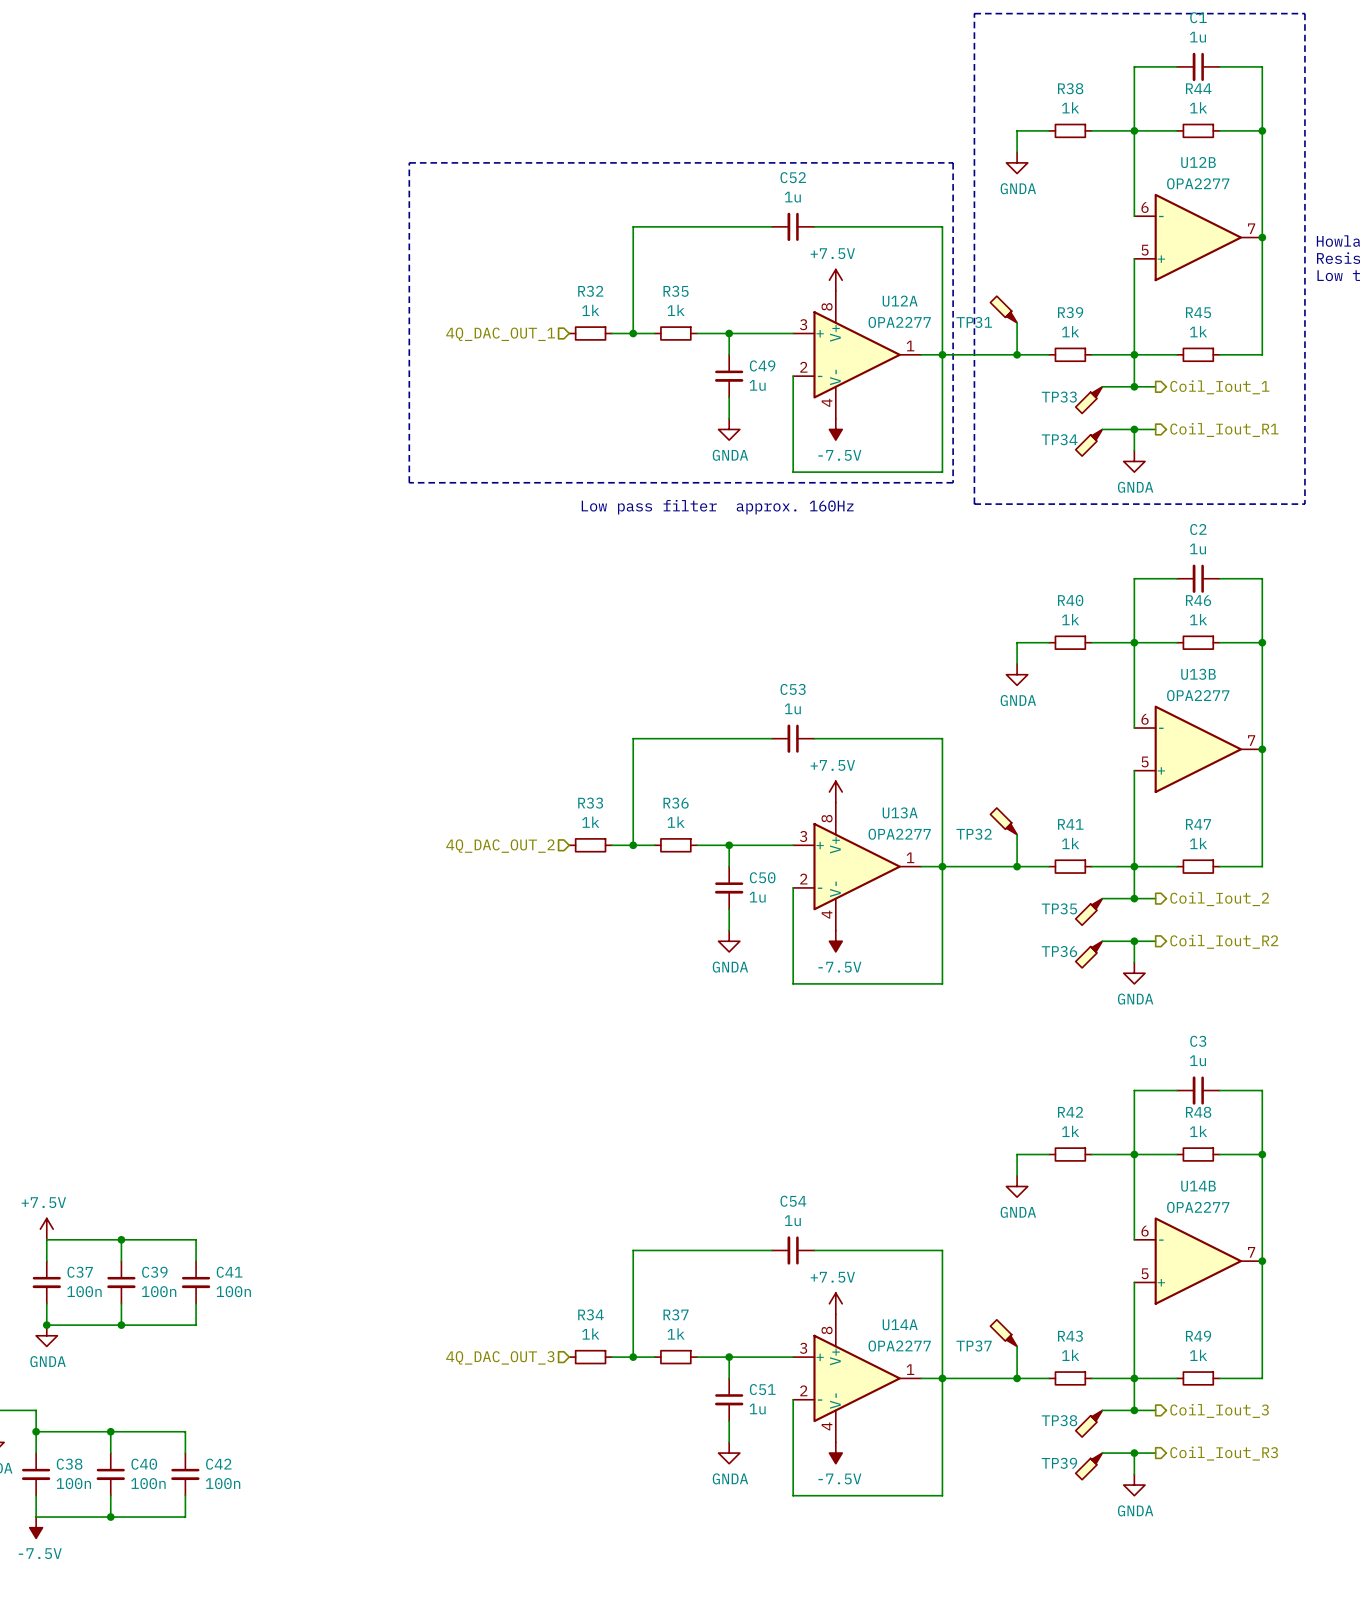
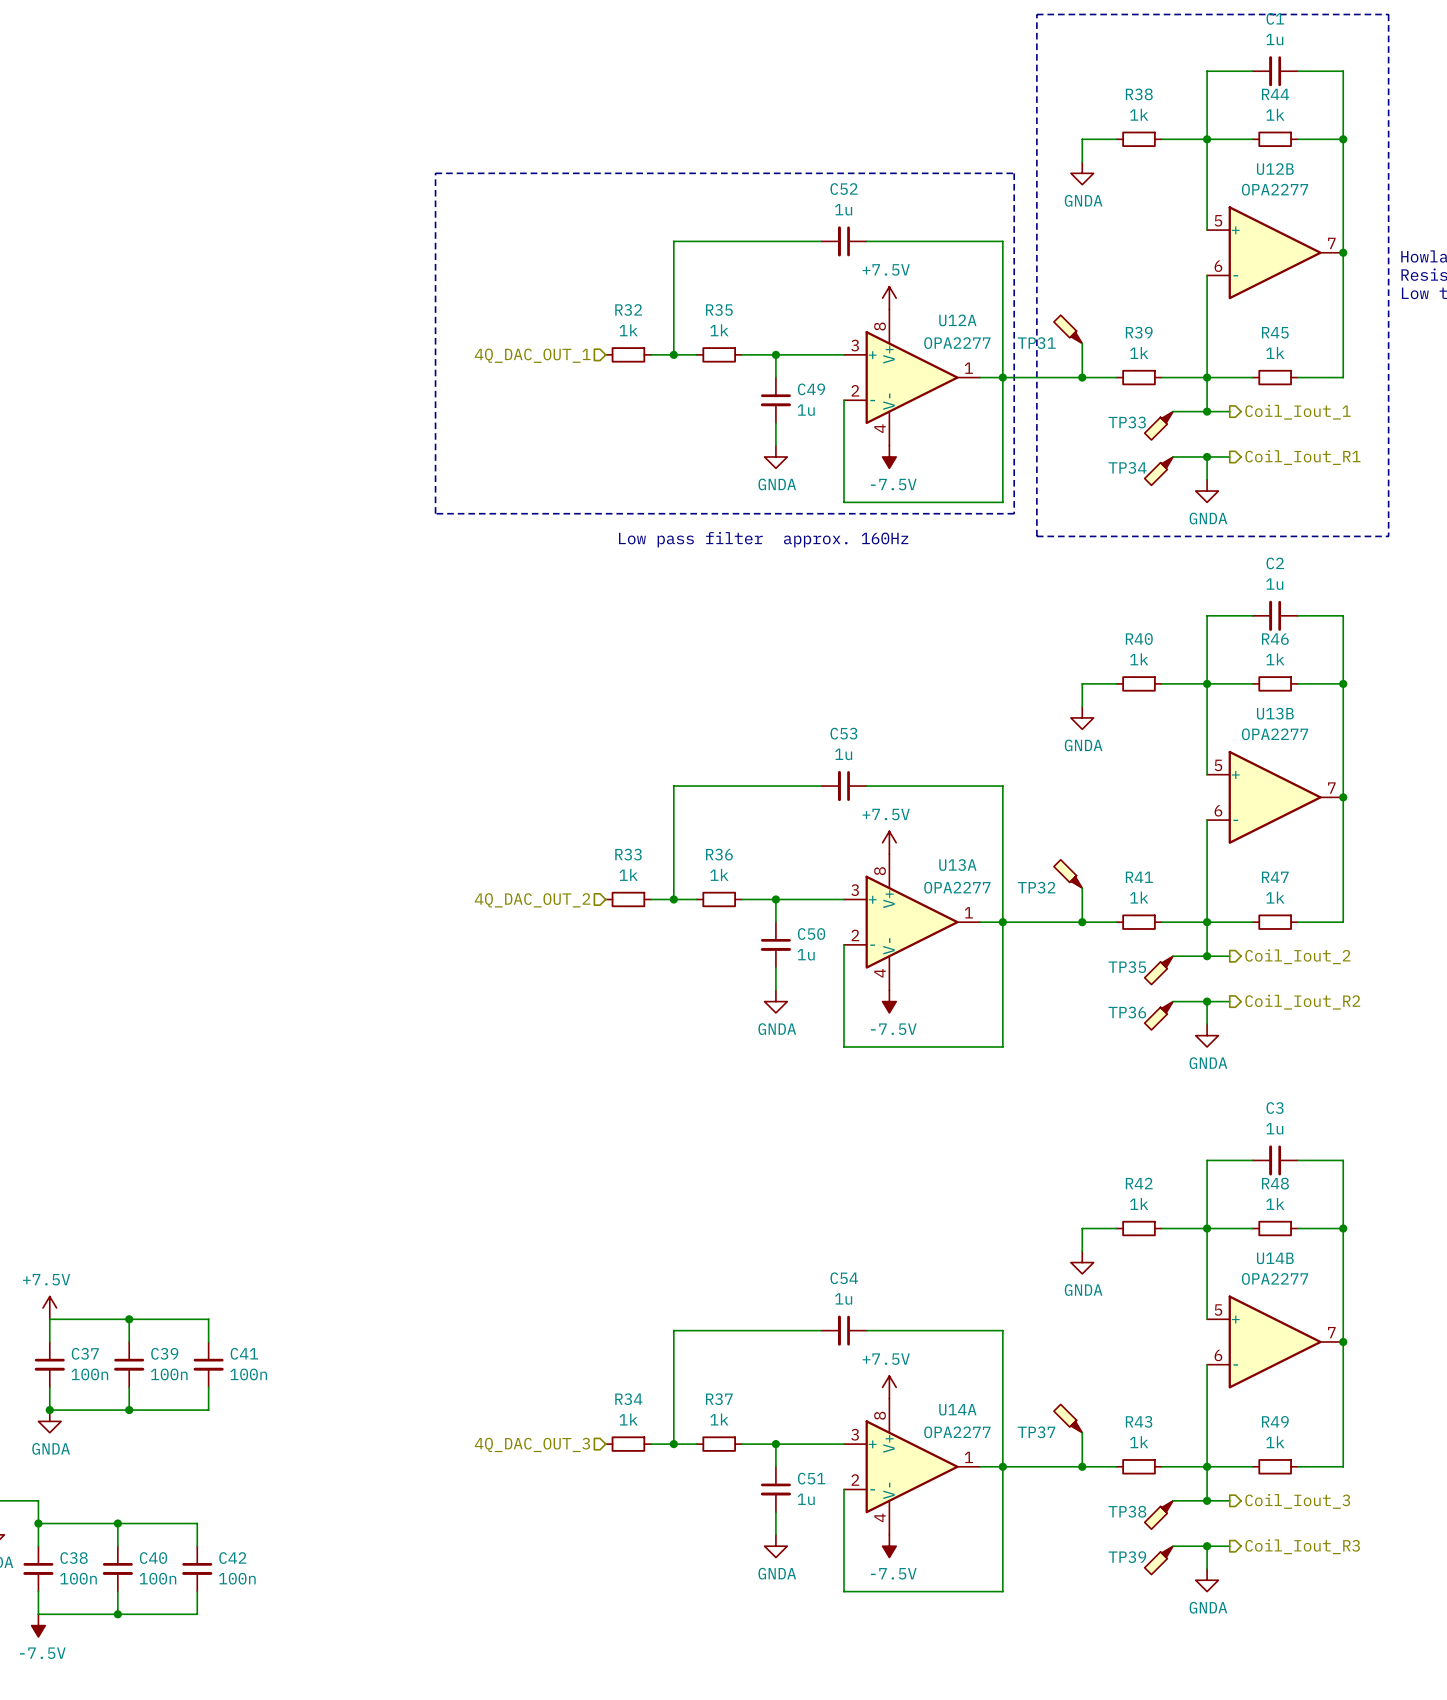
U12B flip: as is (1198, 237) -> up-down (1275, 252)
U13B flip: as is (1198, 749) -> up-down (1275, 797)
U14B flip: as is (1198, 1261) -> up-down (1275, 1341)

